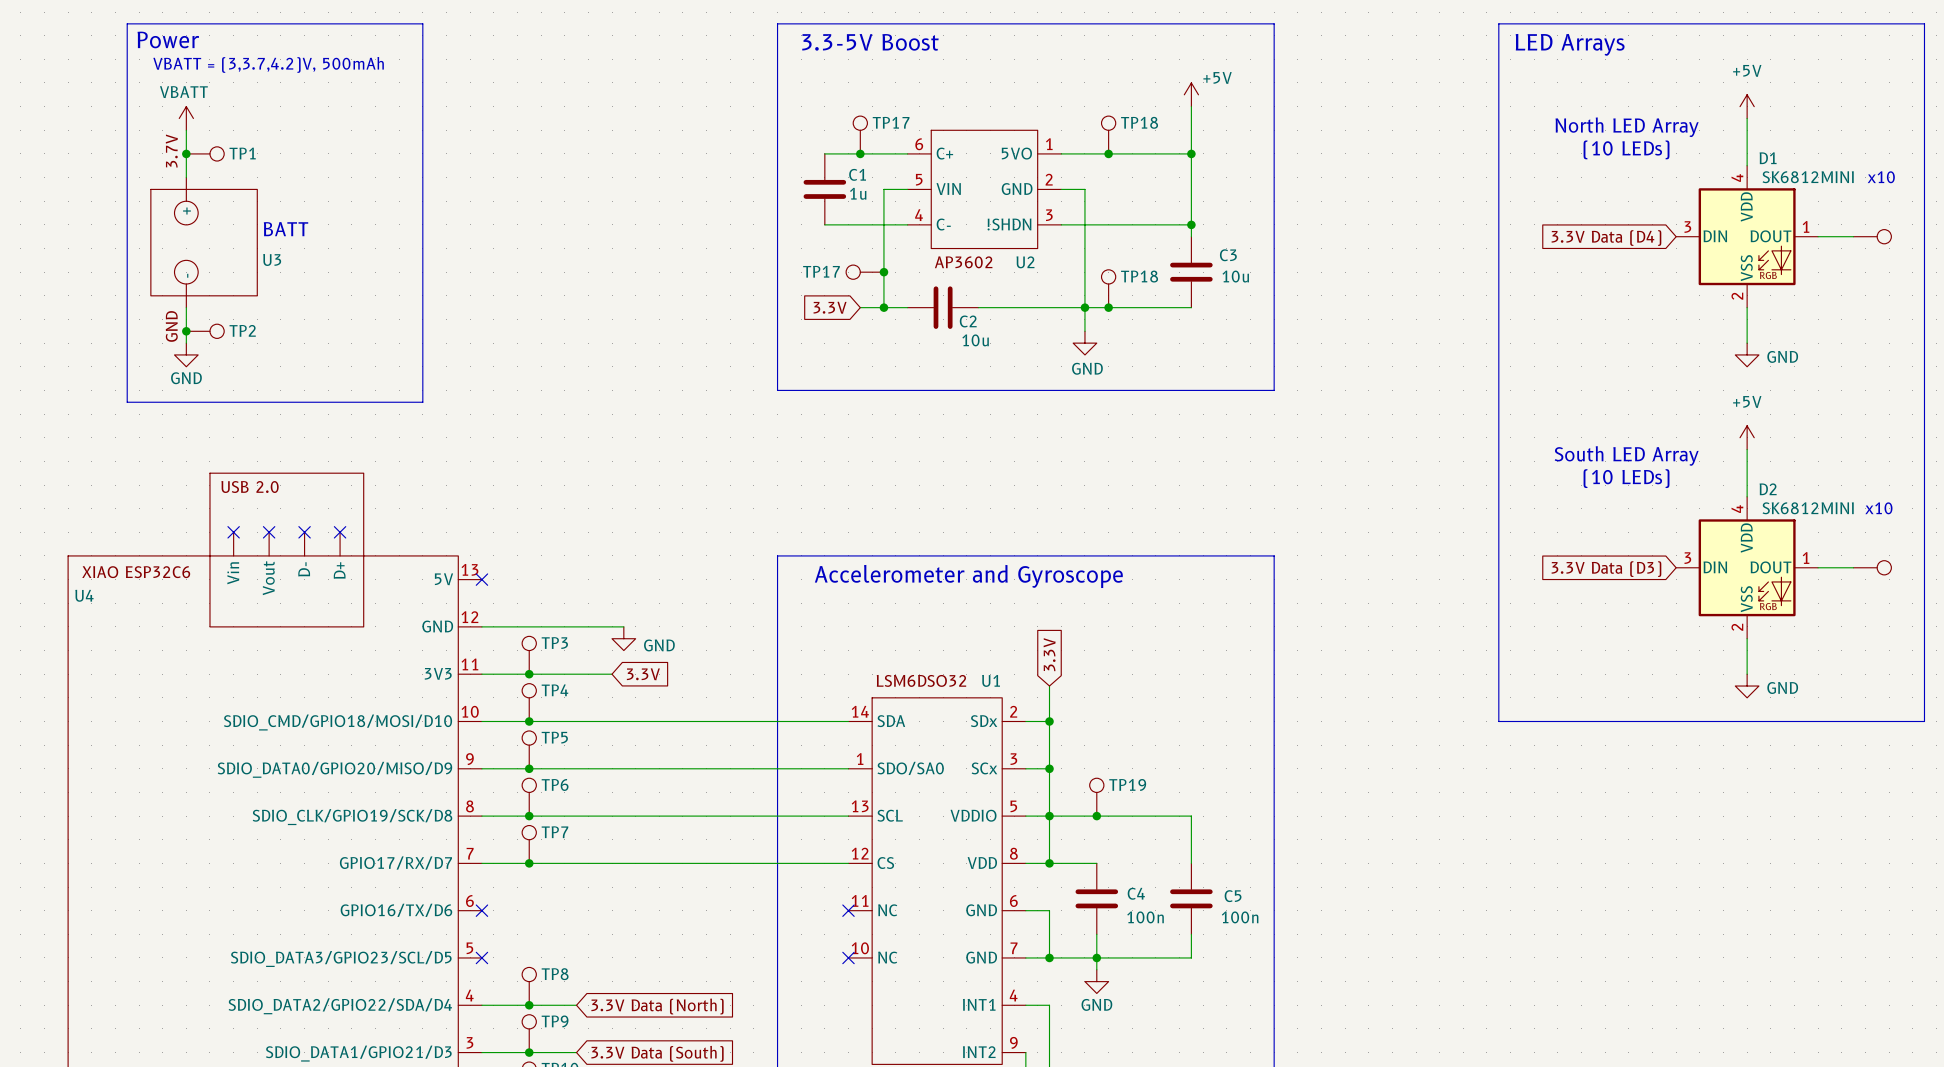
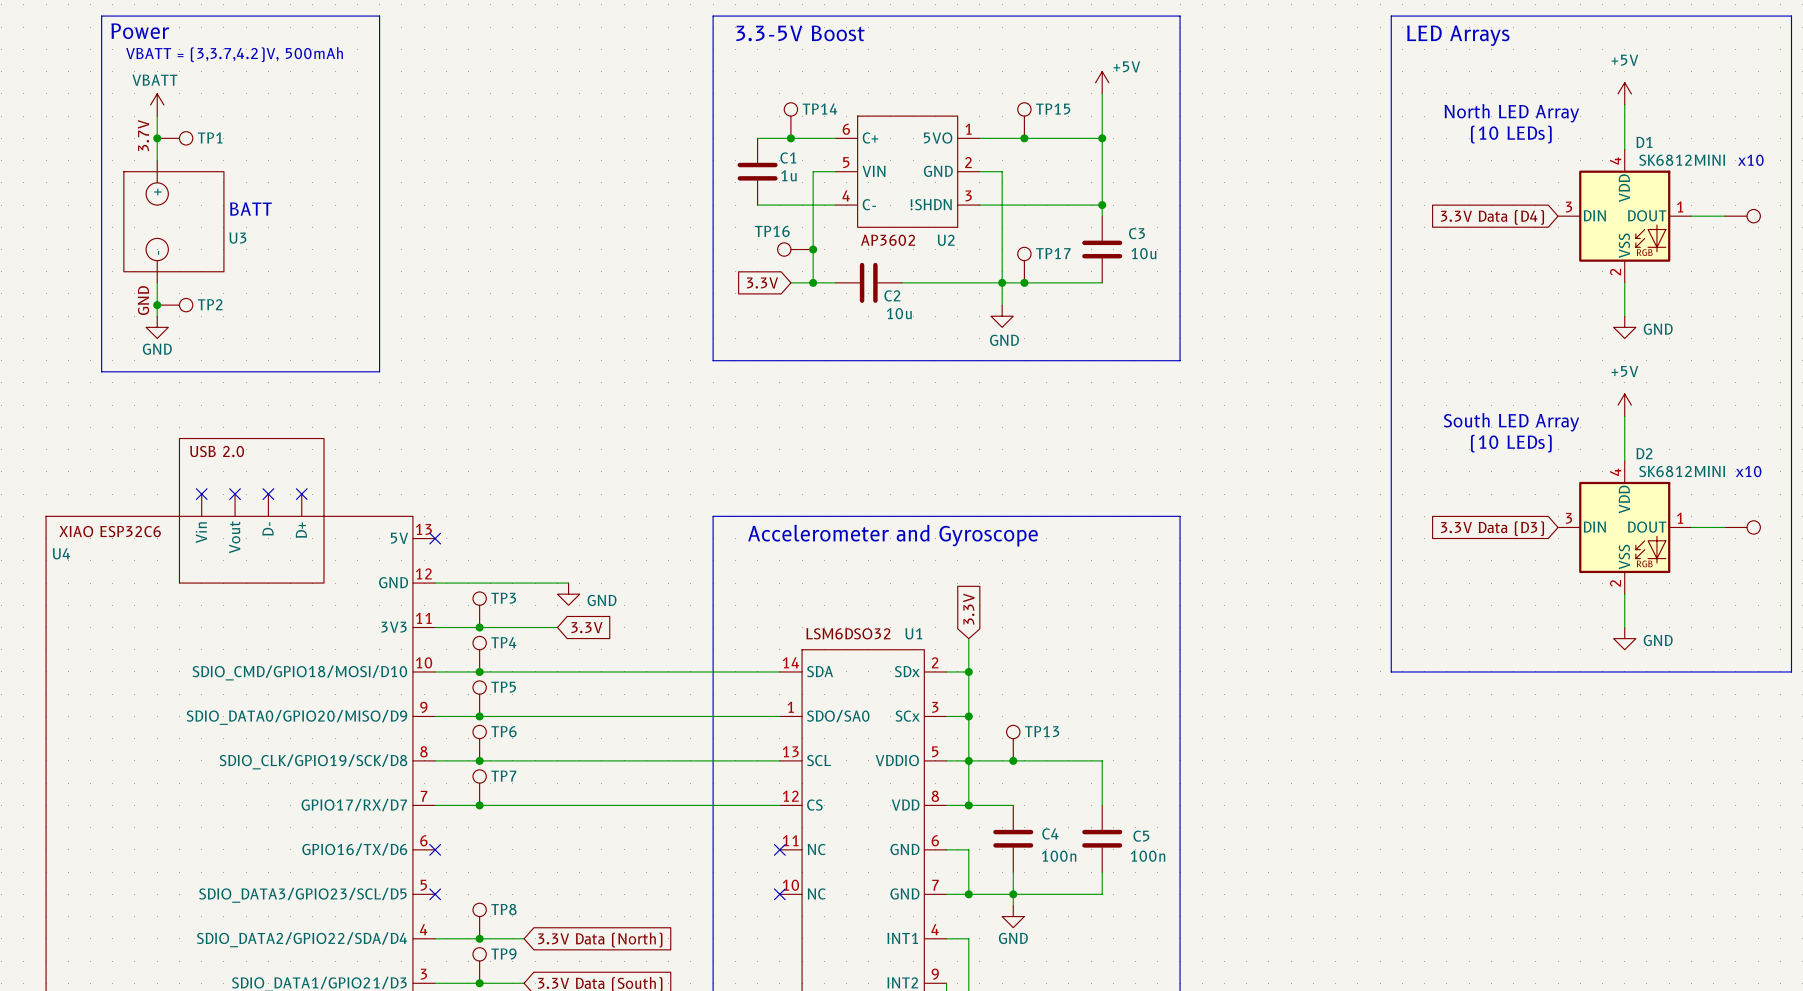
TP17 name: TP17 (891, 122) -> TP14 (819, 109)
TP18 name: TP18 (1139, 122) -> TP15 (1053, 109)
TP17 name: TP17 (821, 271) -> TP16 (772, 231)
TP18 name: TP18 (1139, 276) -> TP17 (1053, 253)
TP19 name: TP19 (1127, 784) -> TP13 (1042, 731)

